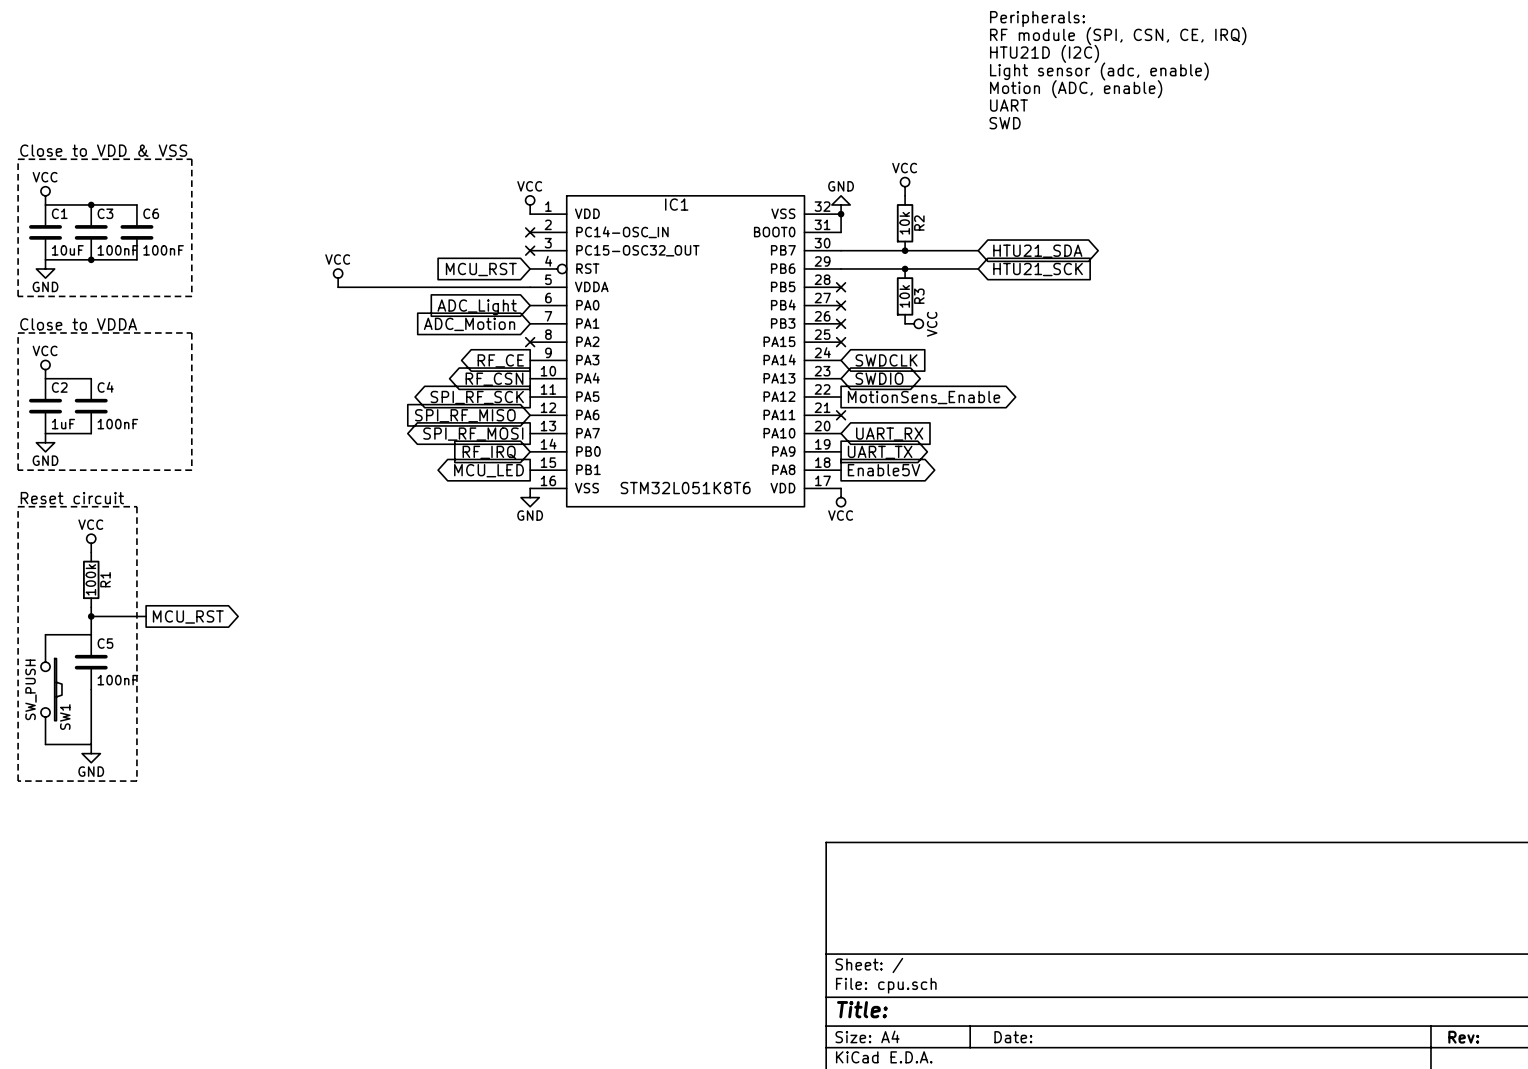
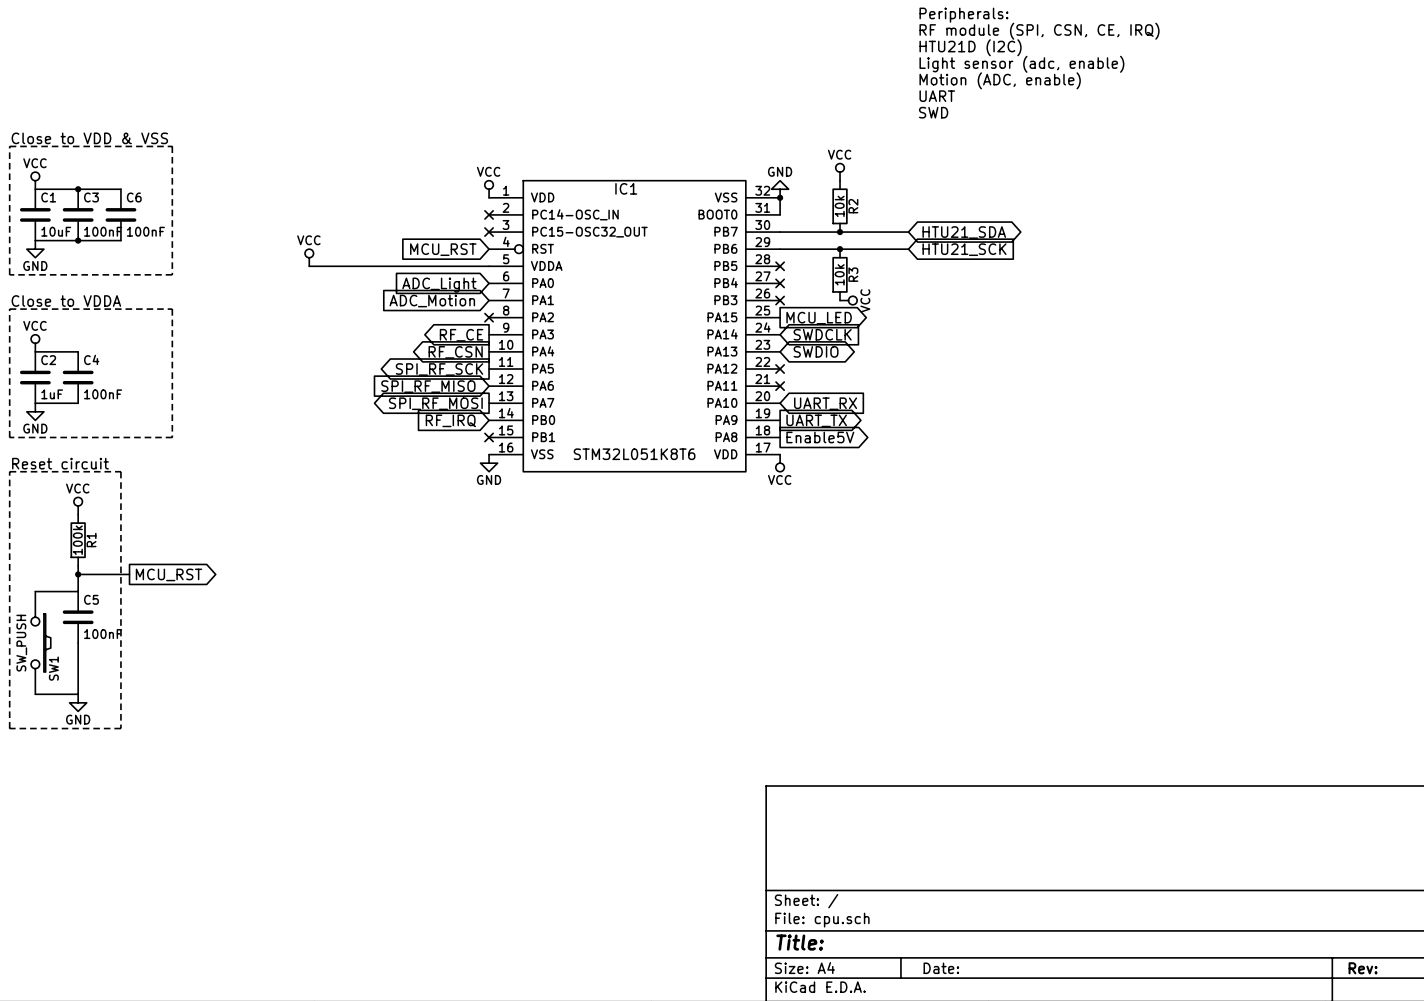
no-connect mark: (841, 342) -> none
global label: none -> MCU_LED (819, 318)
no-connect mark: none -> (780, 369)
global label: MotionSens_Enable (924, 397) -> none
global label: MCU_LED (489, 470) -> none
no-connect mark: none -> (489, 437)

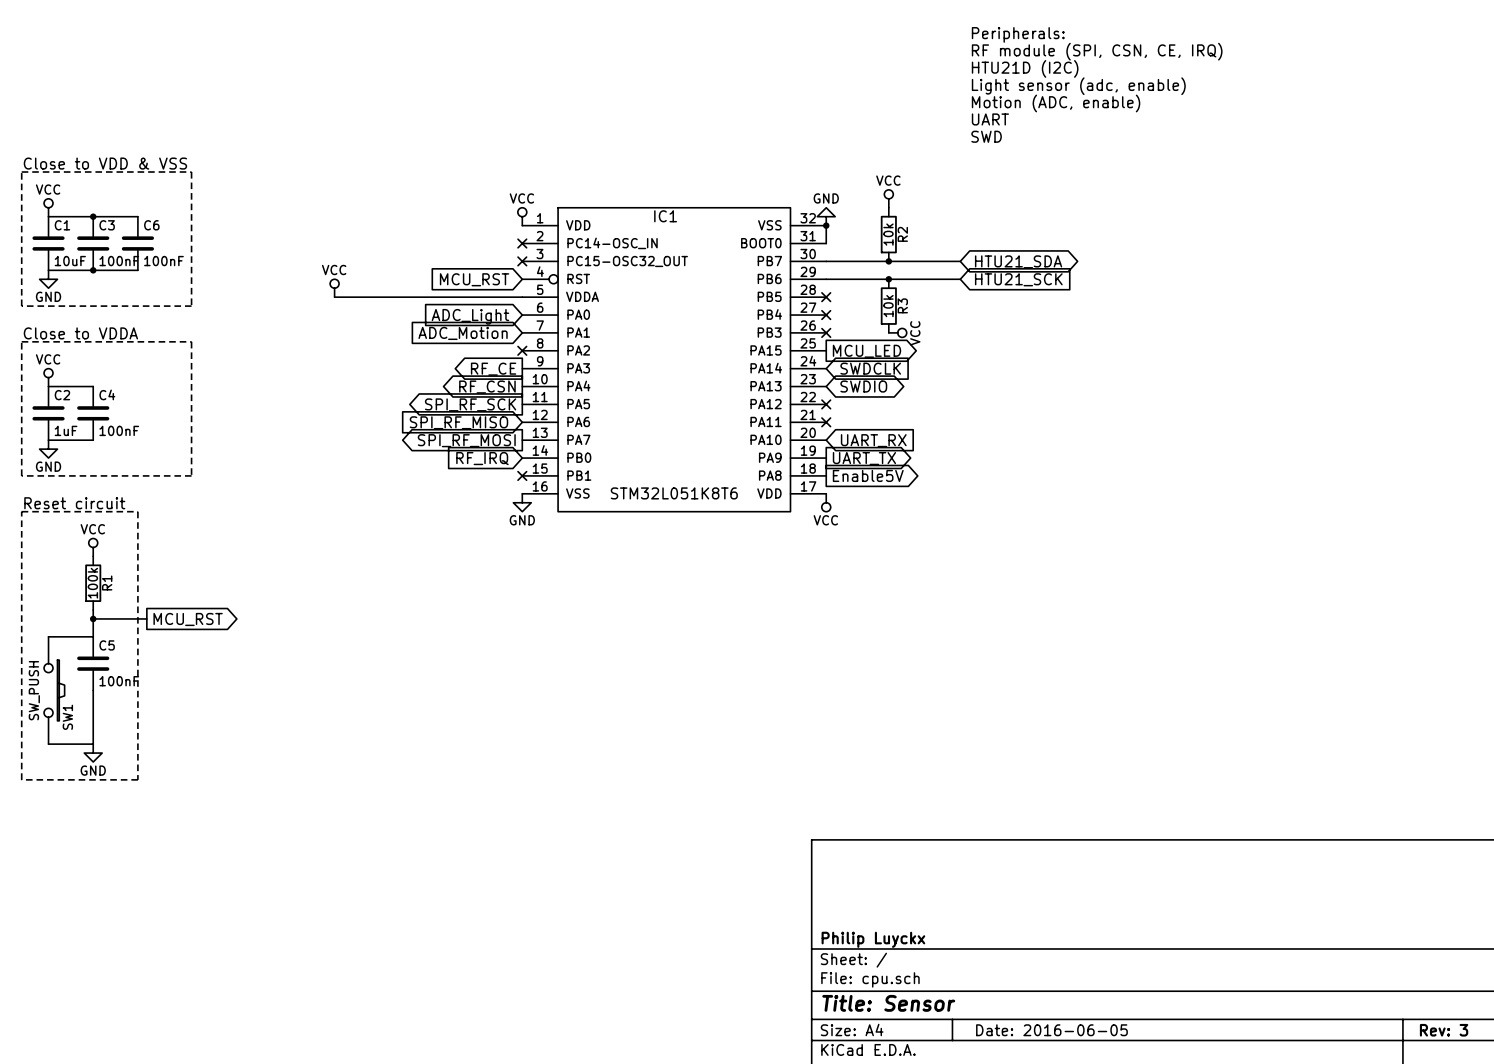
title block: none -> Philip Luyckx (873, 939)
title block: Title: (800, 942) -> Title: Sensor (888, 1003)
title block: Date: (941, 968) -> Date: 2016-06-05 (1051, 1030)
title block: Rev: (1363, 968) -> Rev: 3 (1444, 1030)

